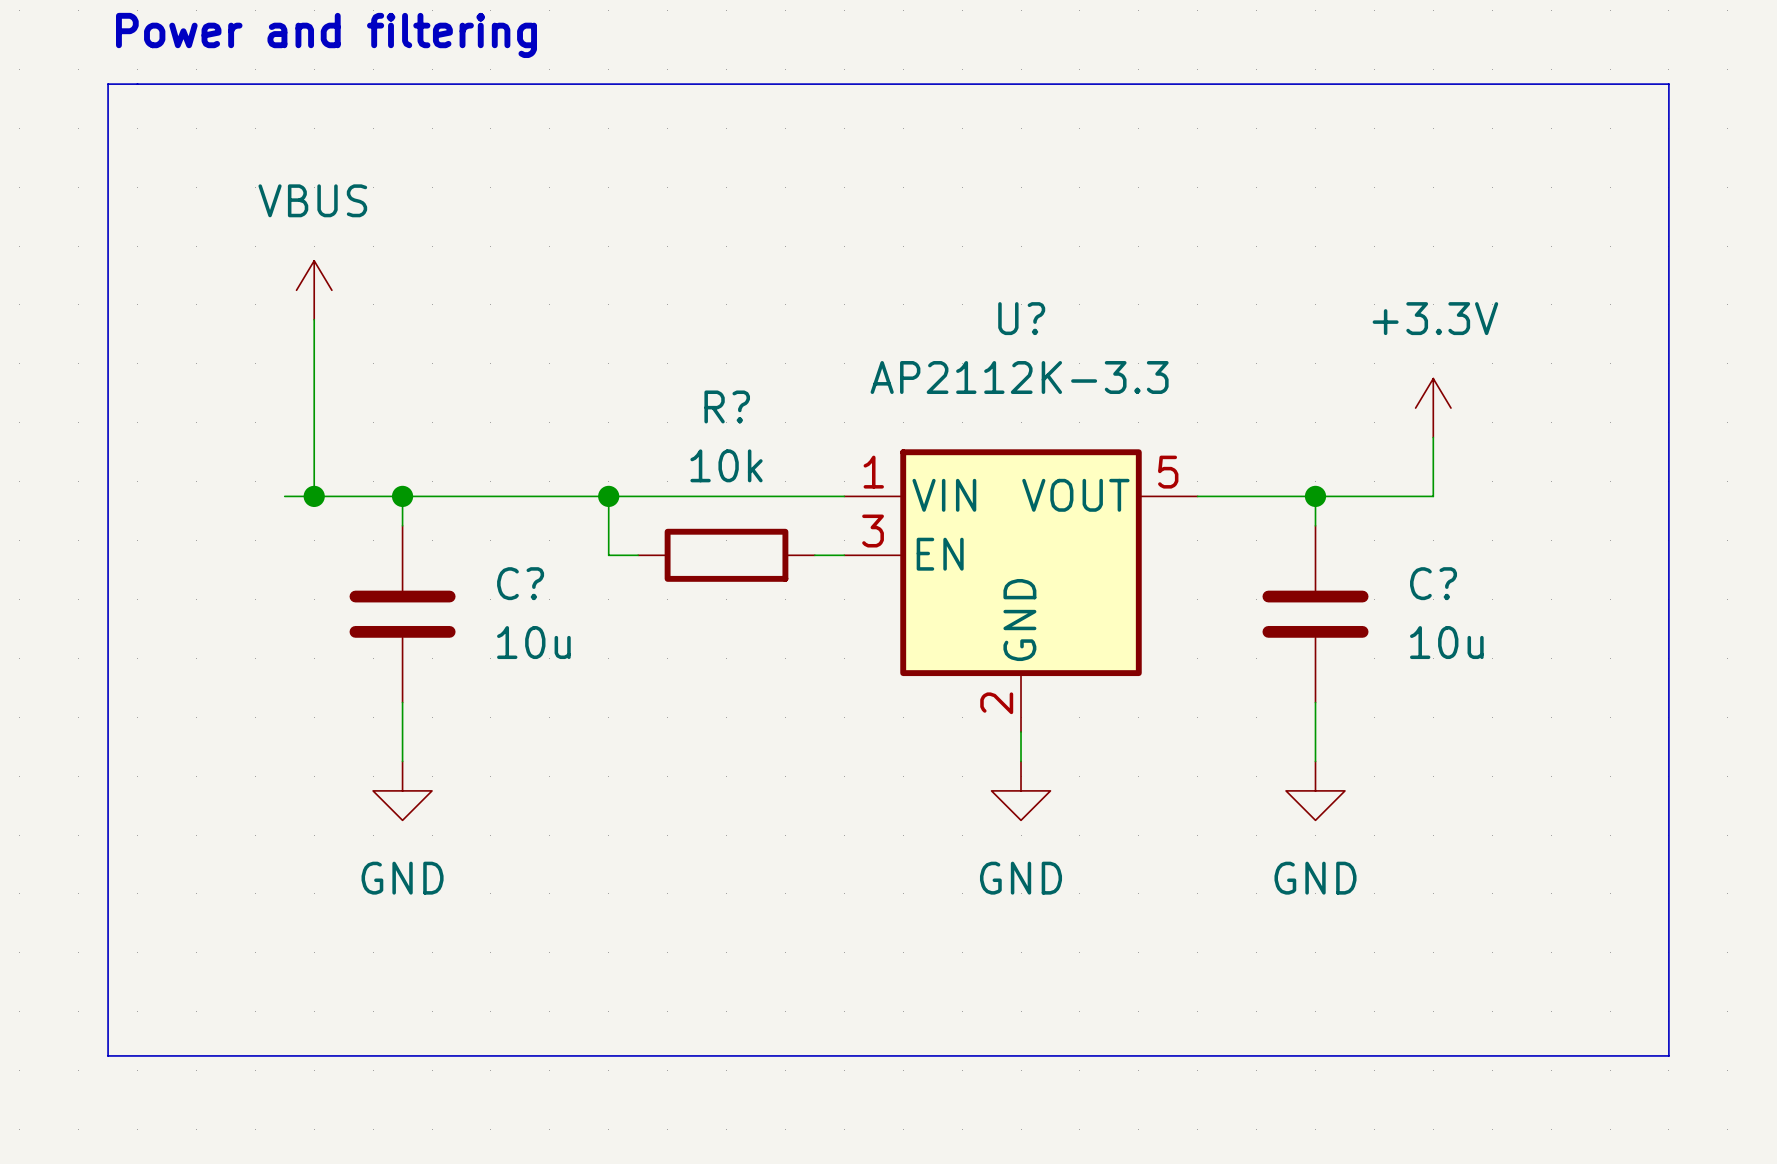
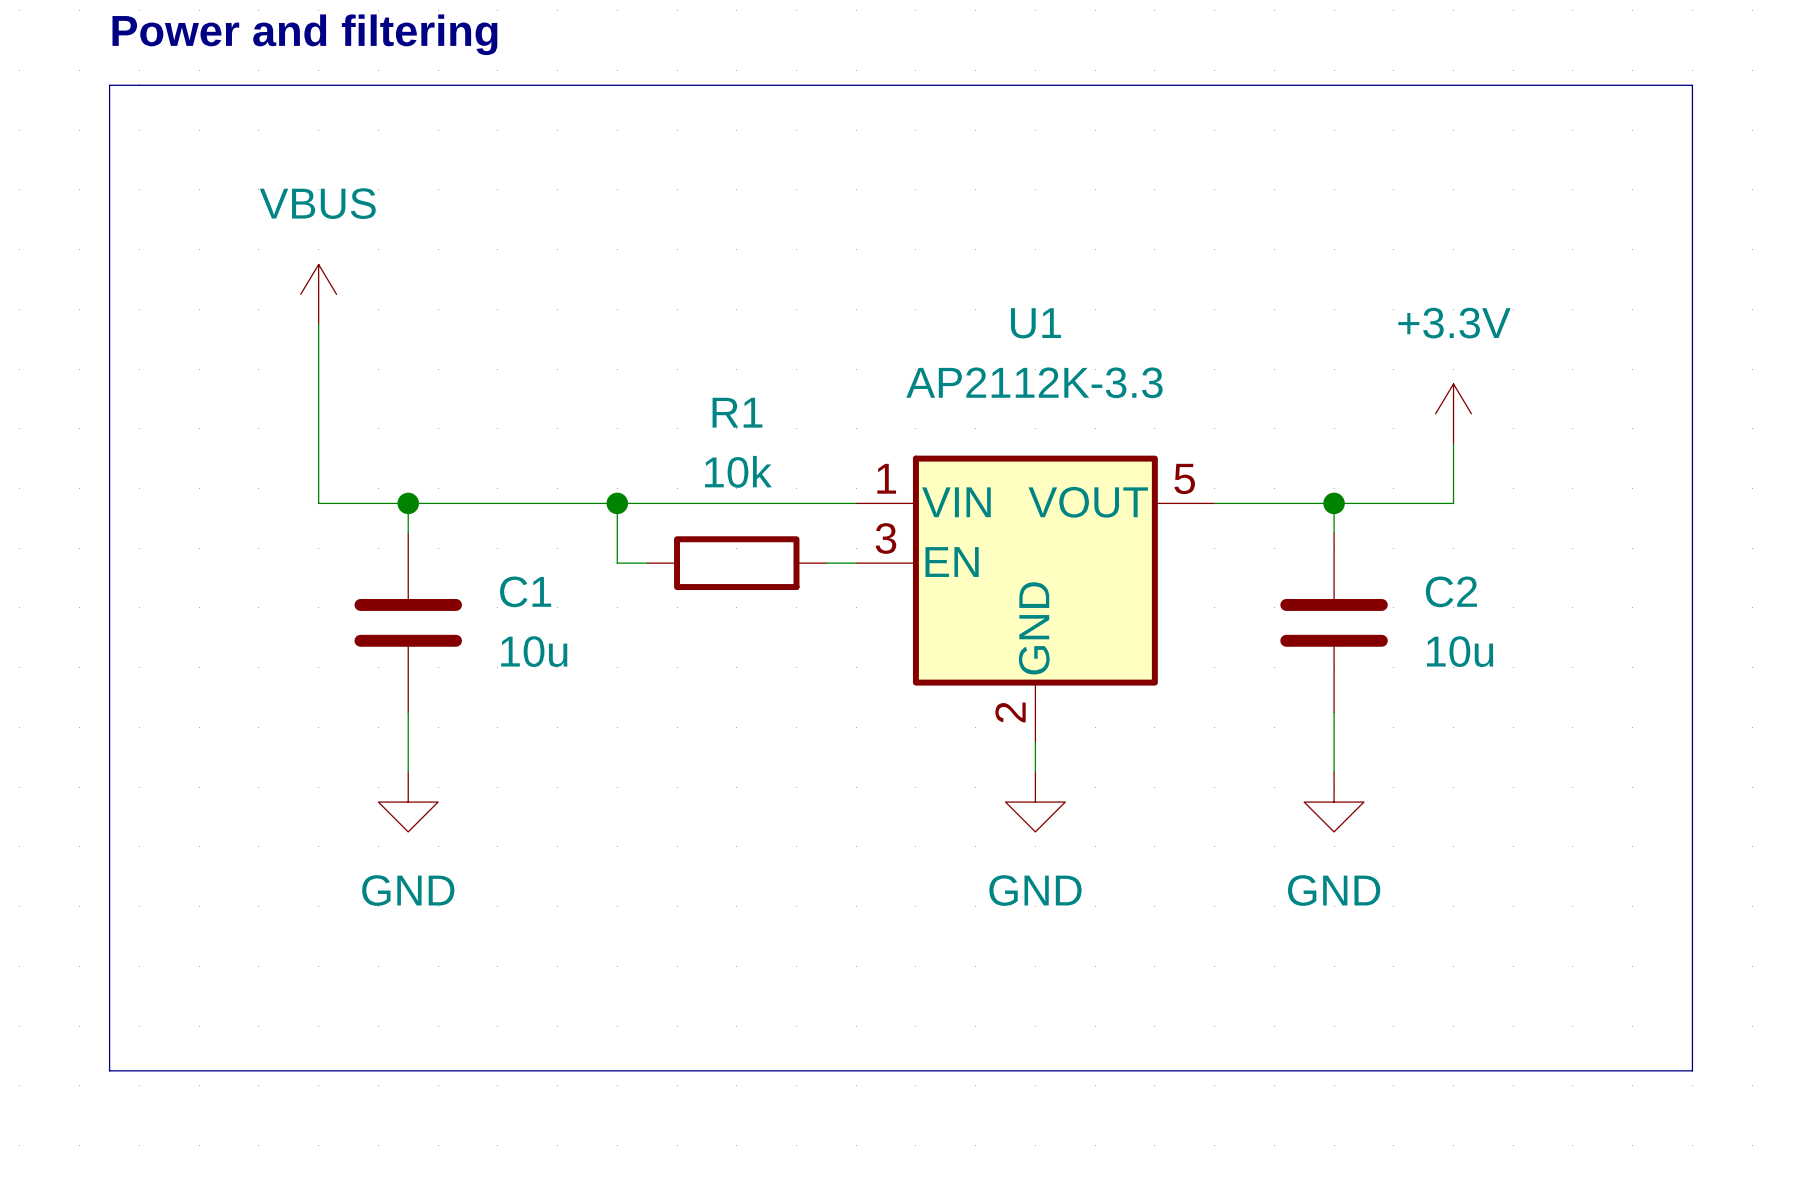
U? name: U? (1021, 318) -> U1 (1036, 323)
R? name: R? (727, 406) -> R1 (737, 412)
wire: (284, 496) (314, 496) -> none
junction: (314, 496) -> none
C? name: C? (520, 583) -> C1 (525, 591)
C? name: C? (1433, 583) -> C2 (1451, 591)

